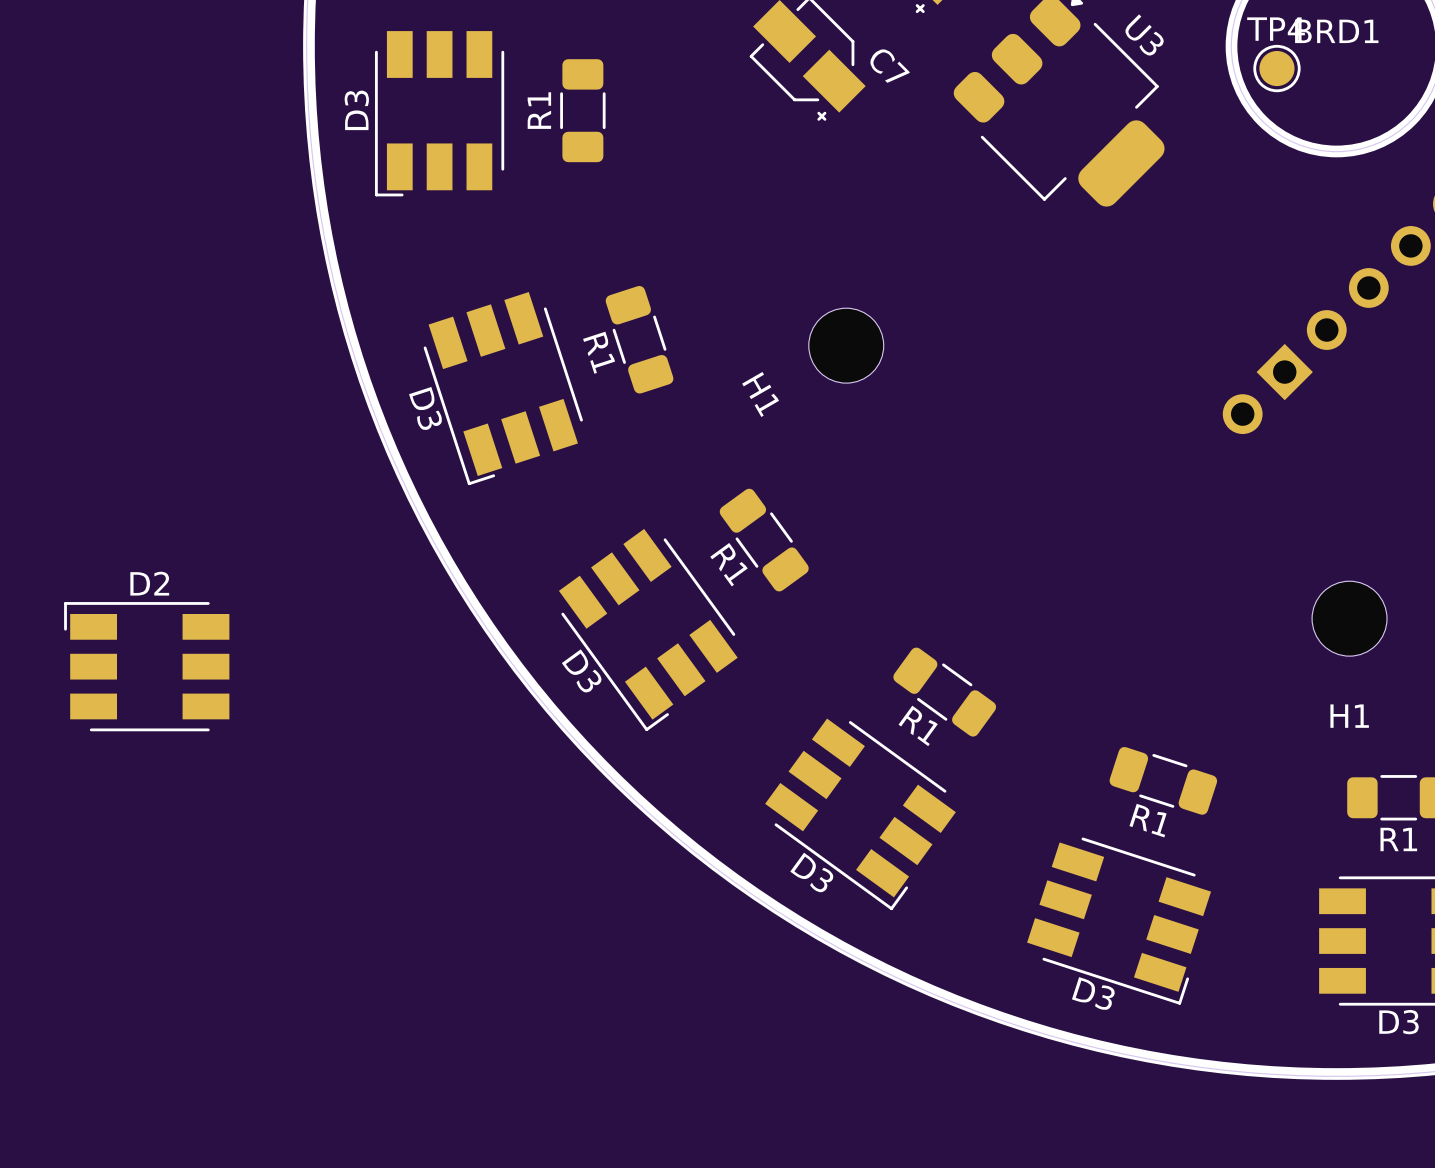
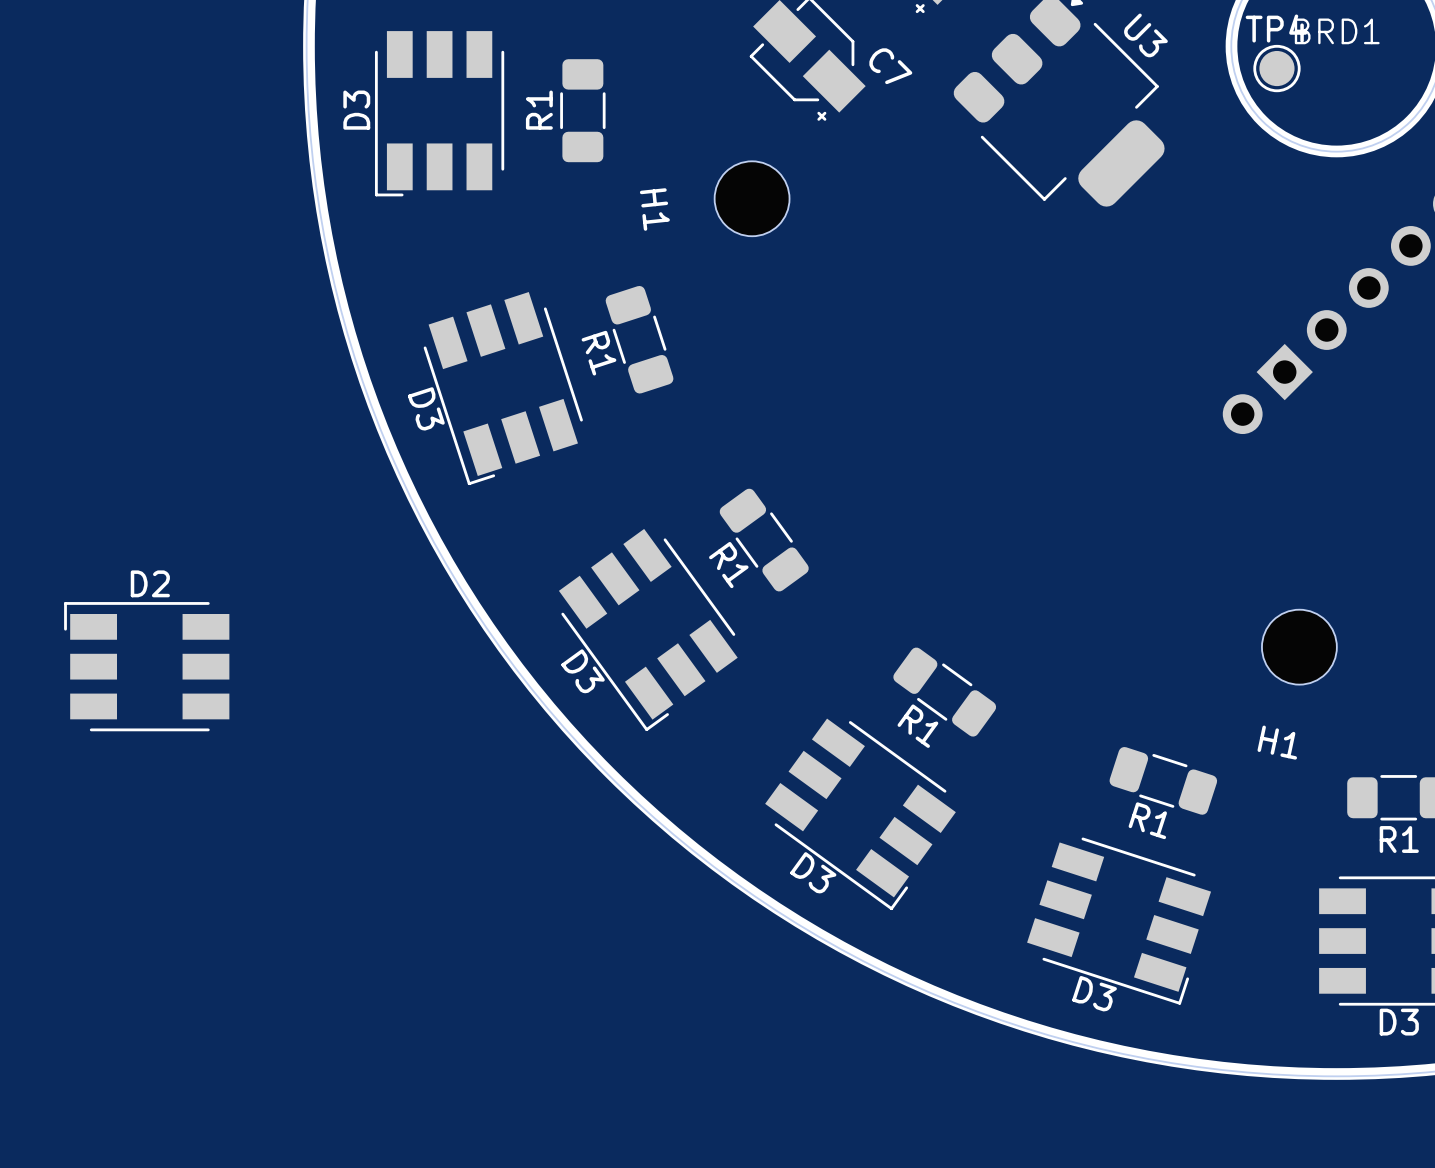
H1 position: (846, 345) -> (752, 198)
H1 name rotation: 0° (760, 394) -> 24° clockwise (654, 209)
H1 position: (1349, 618) -> (1299, 647)
H1 name rotation: 0° (1349, 716) -> 12° clockwise (1277, 742)

